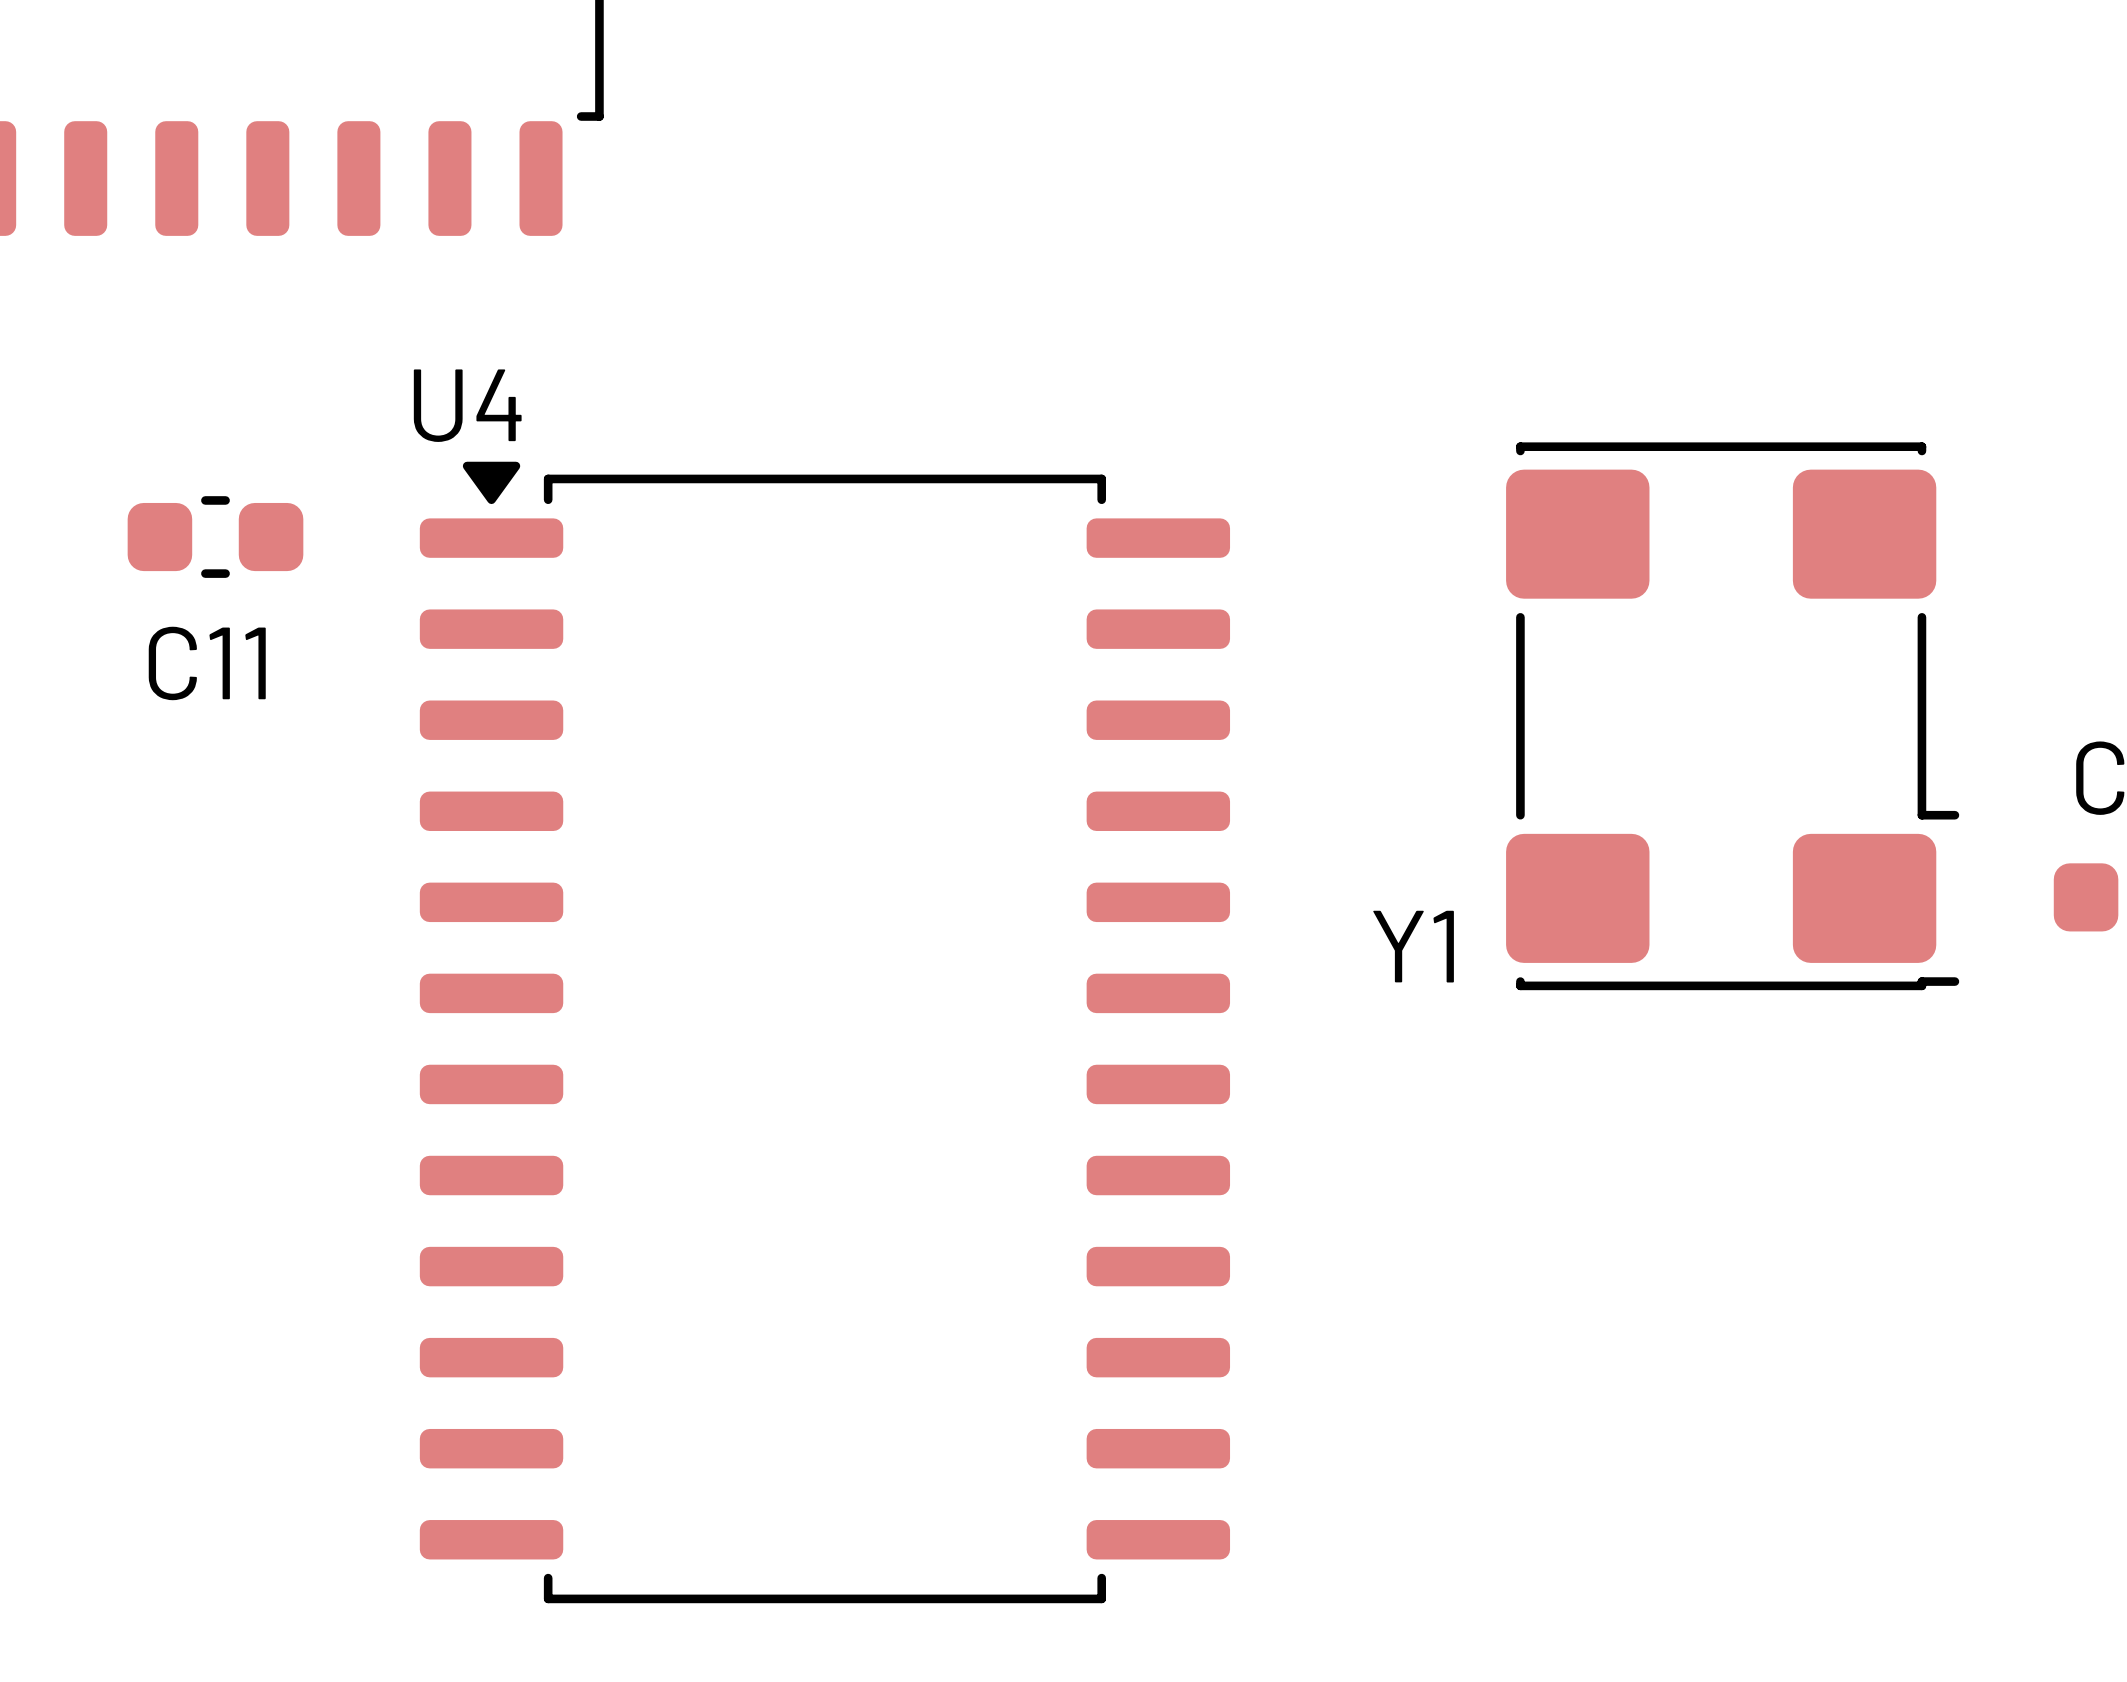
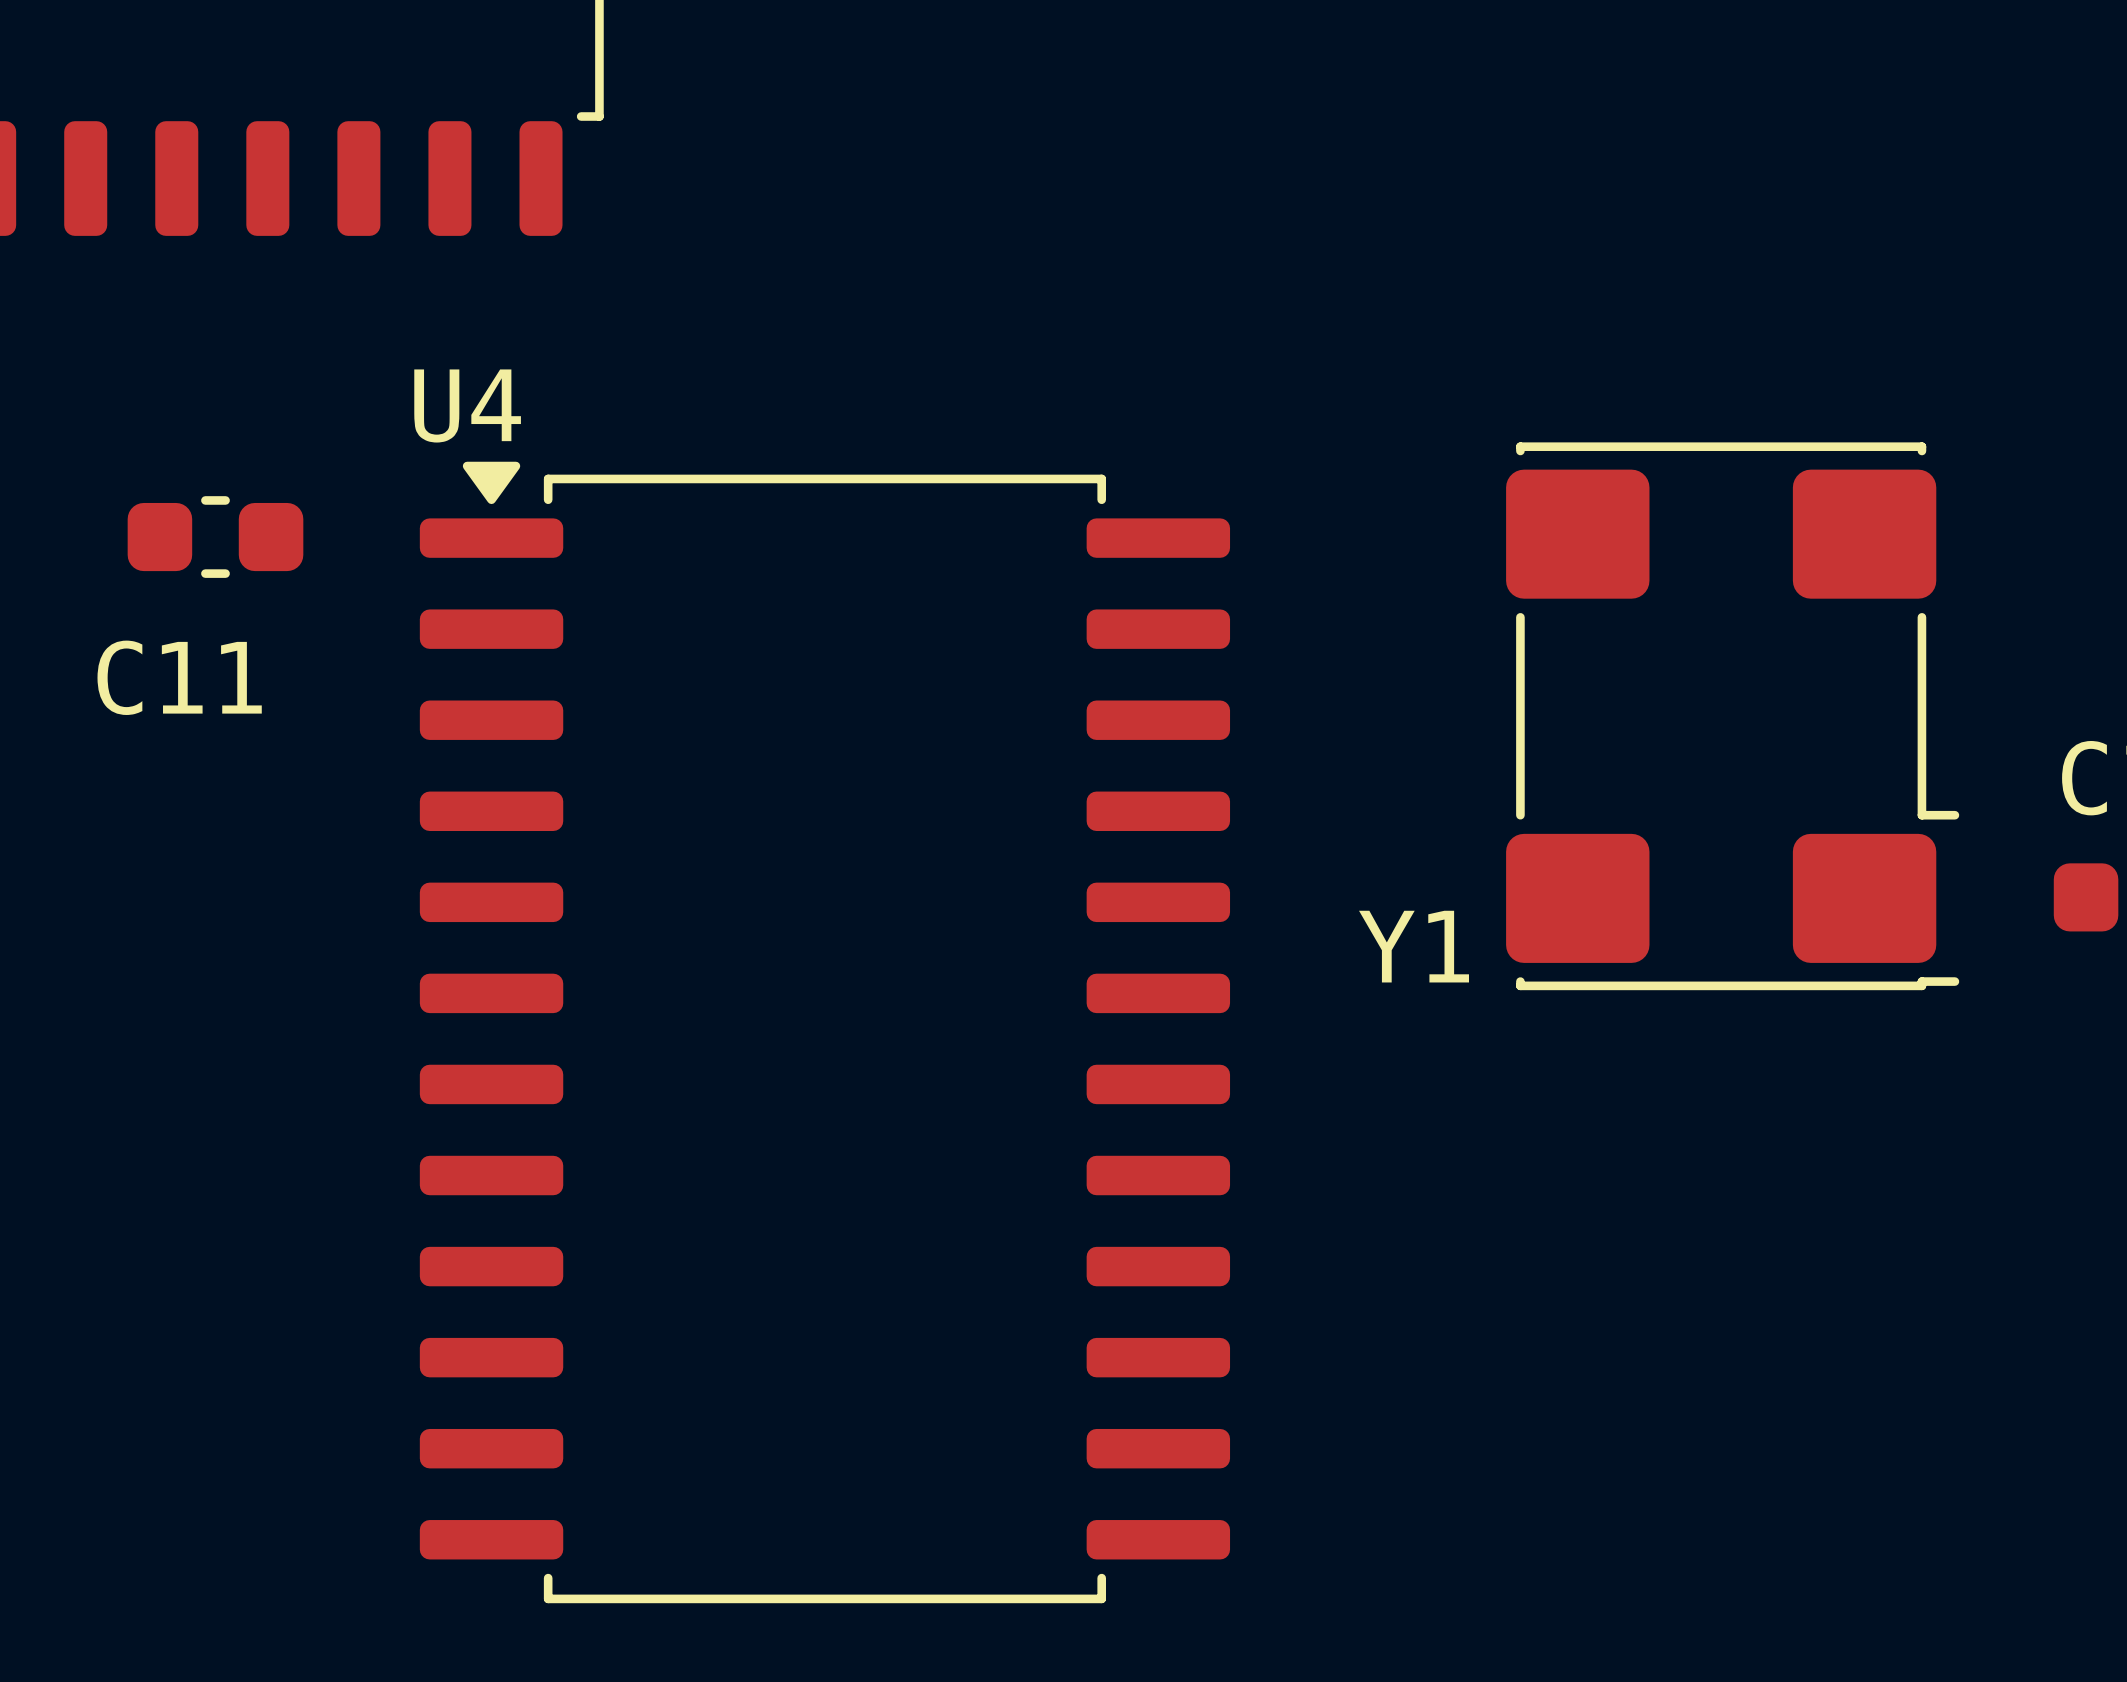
C11 name position: C11 (207, 663) -> C11 (179, 677)

